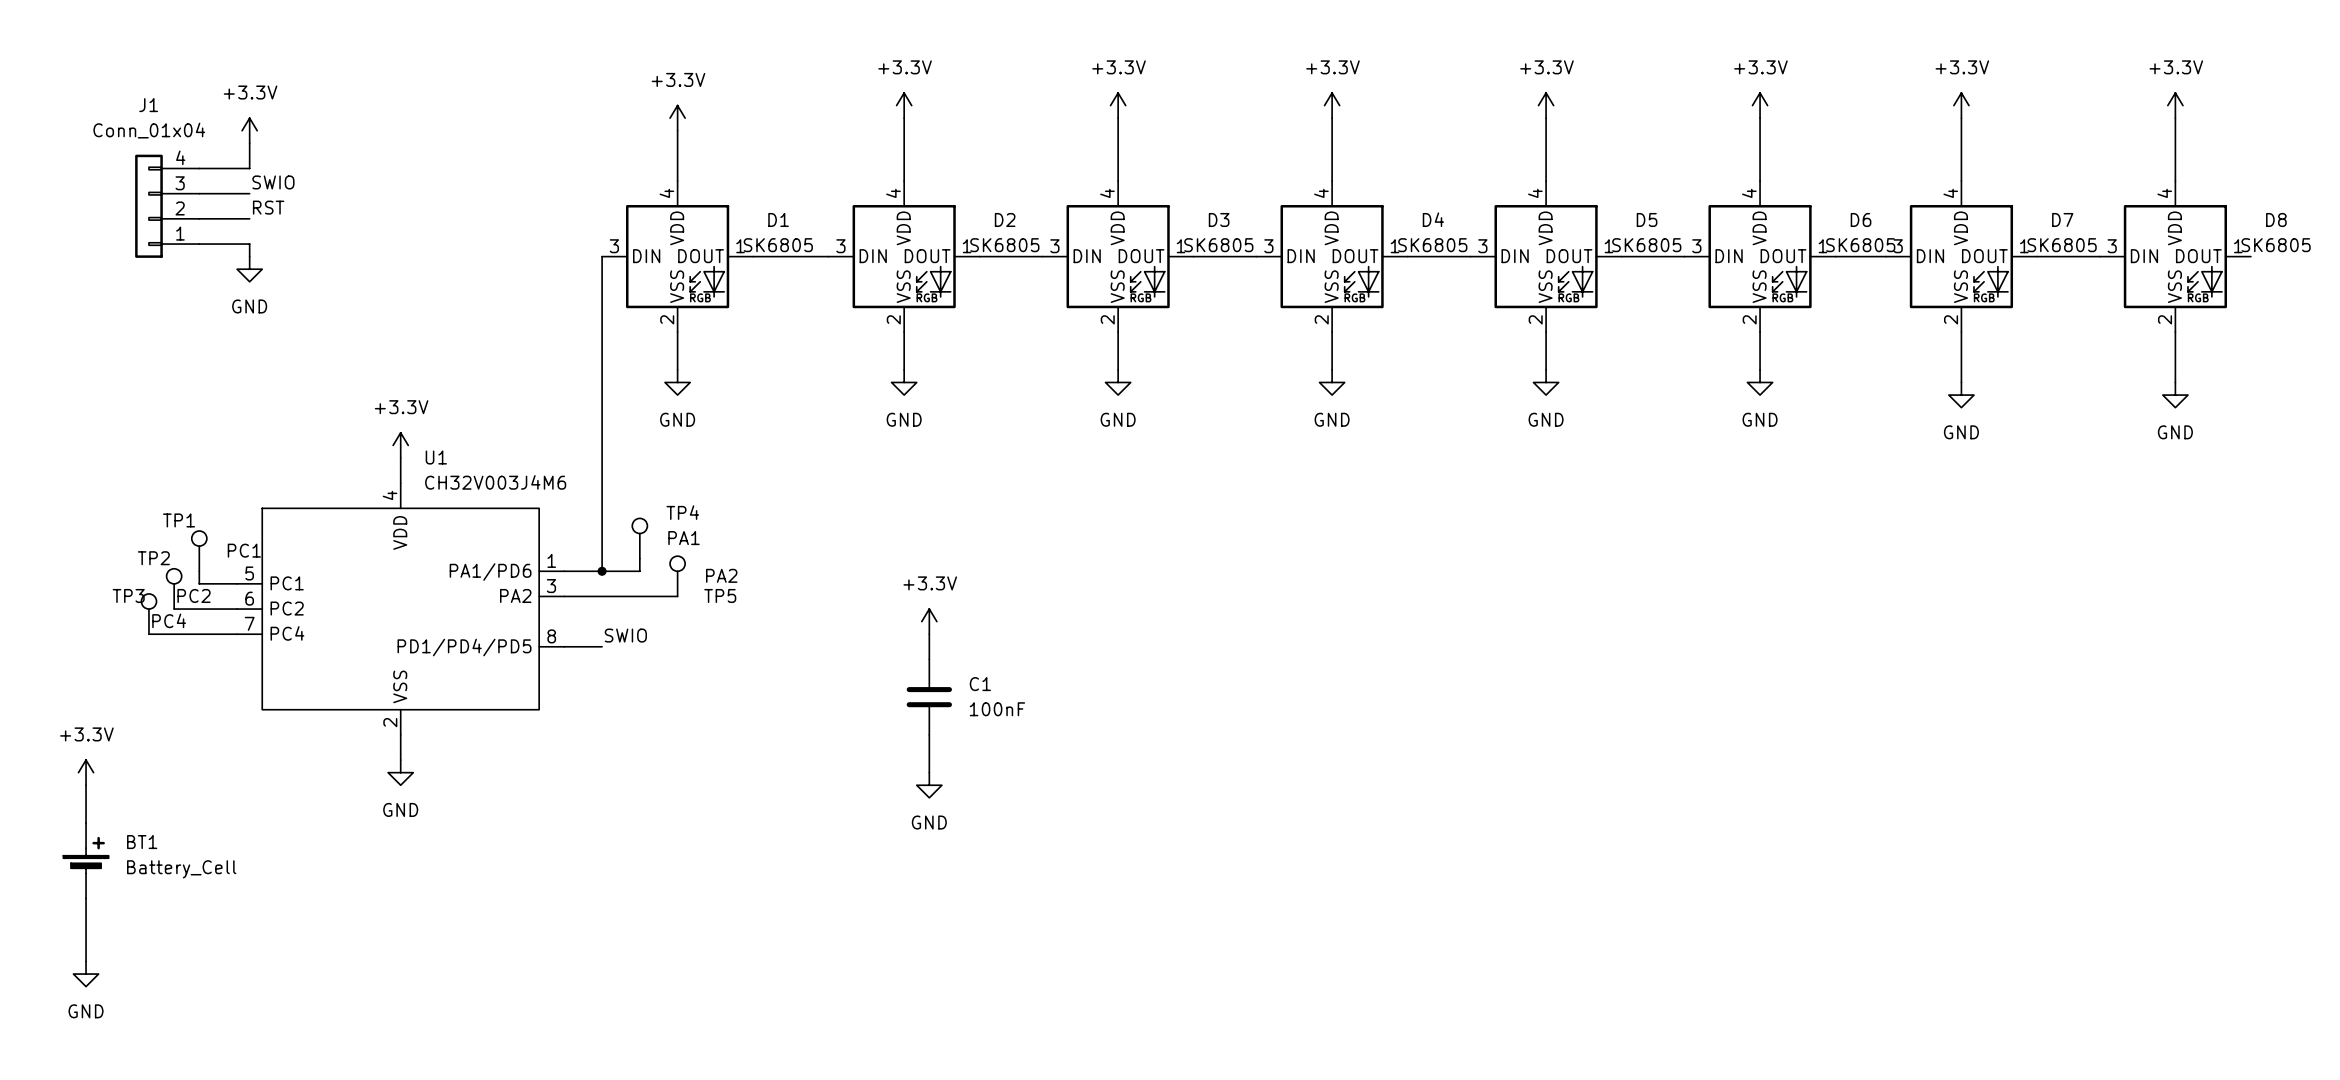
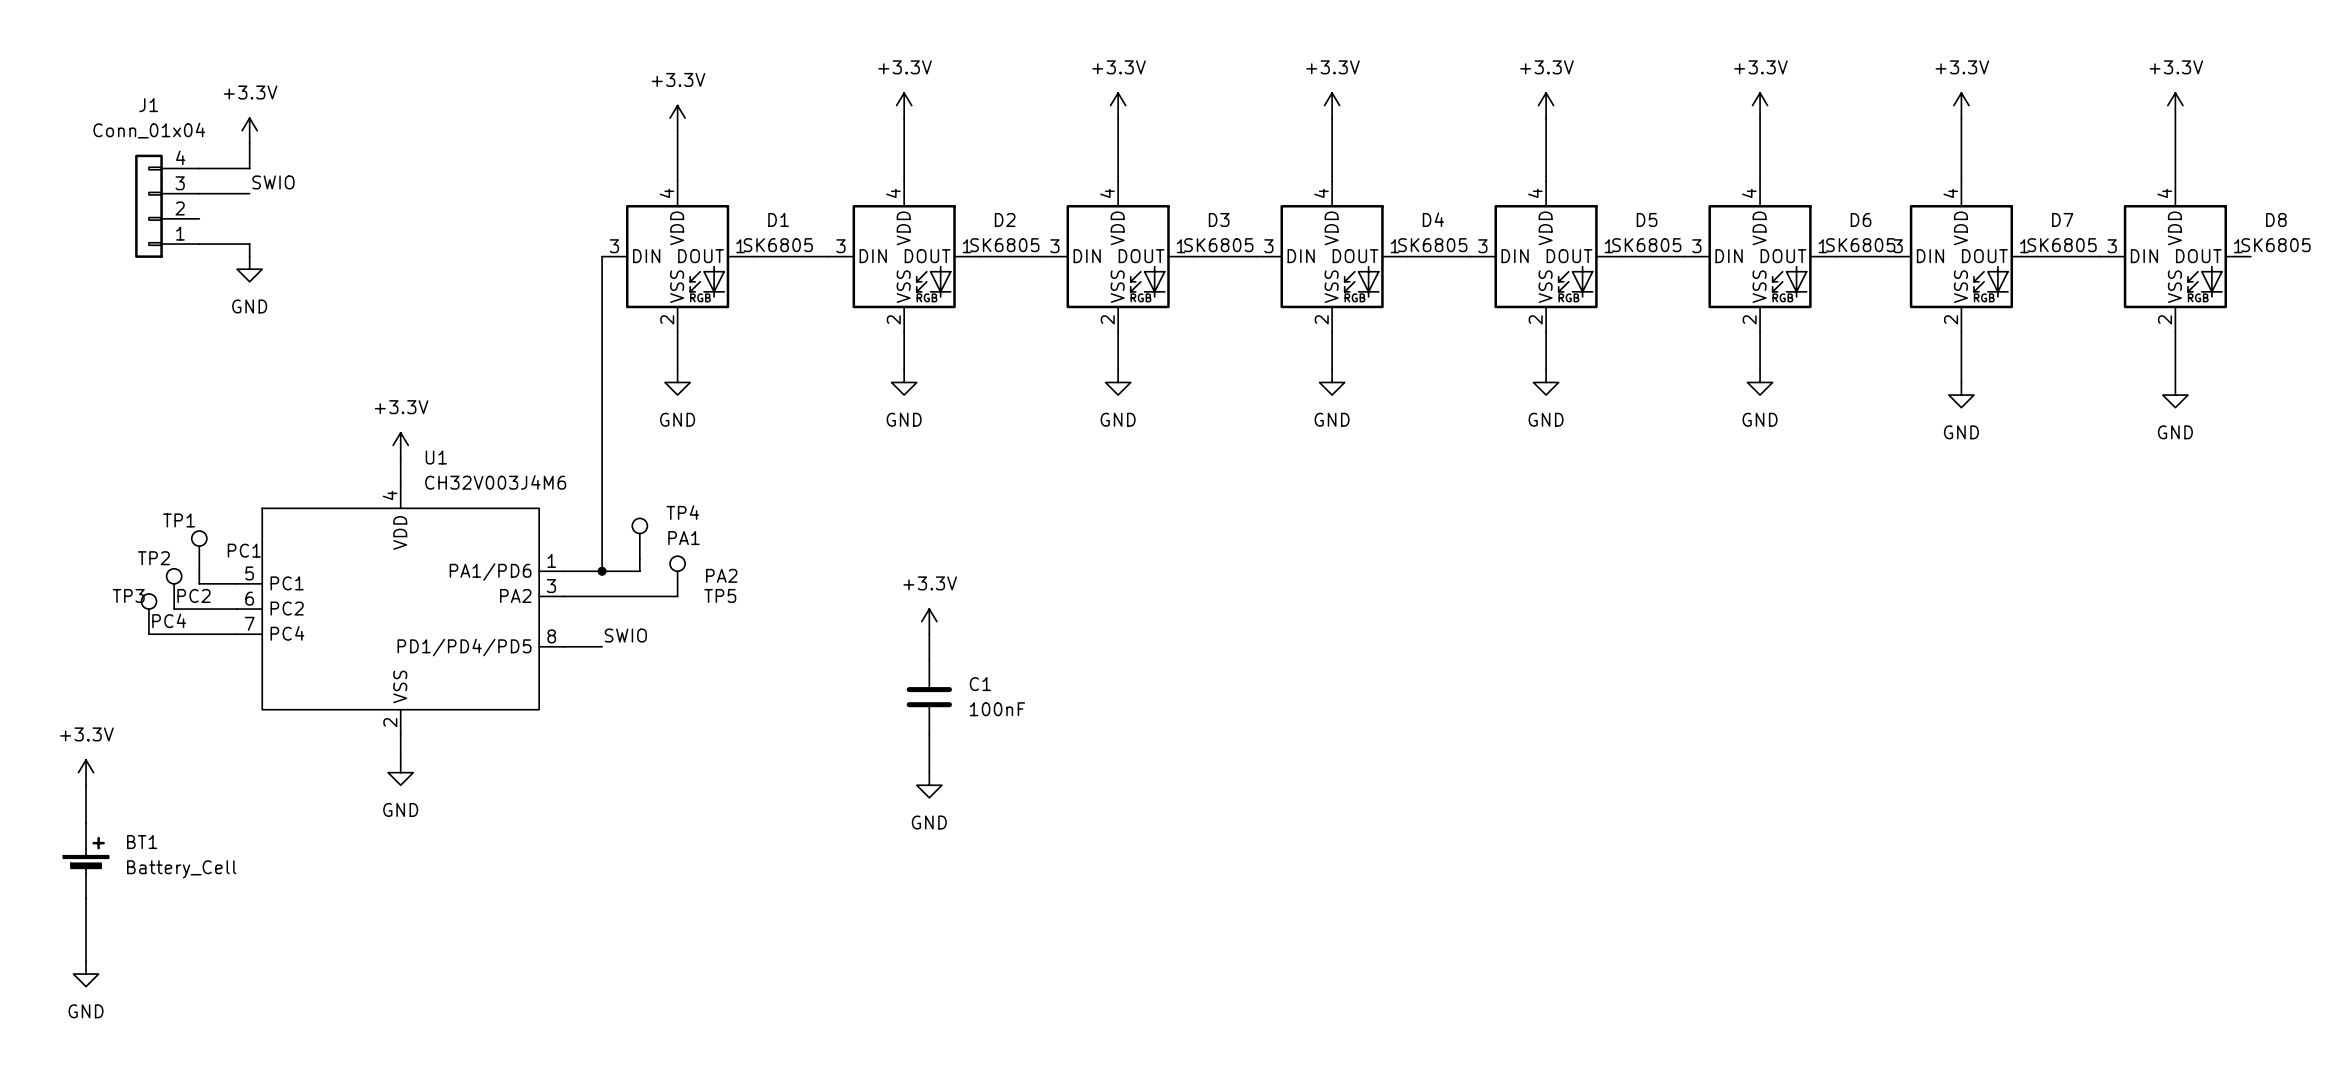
label: RST (268, 207) -> none
wire: (199, 218) (249, 218) -> none

